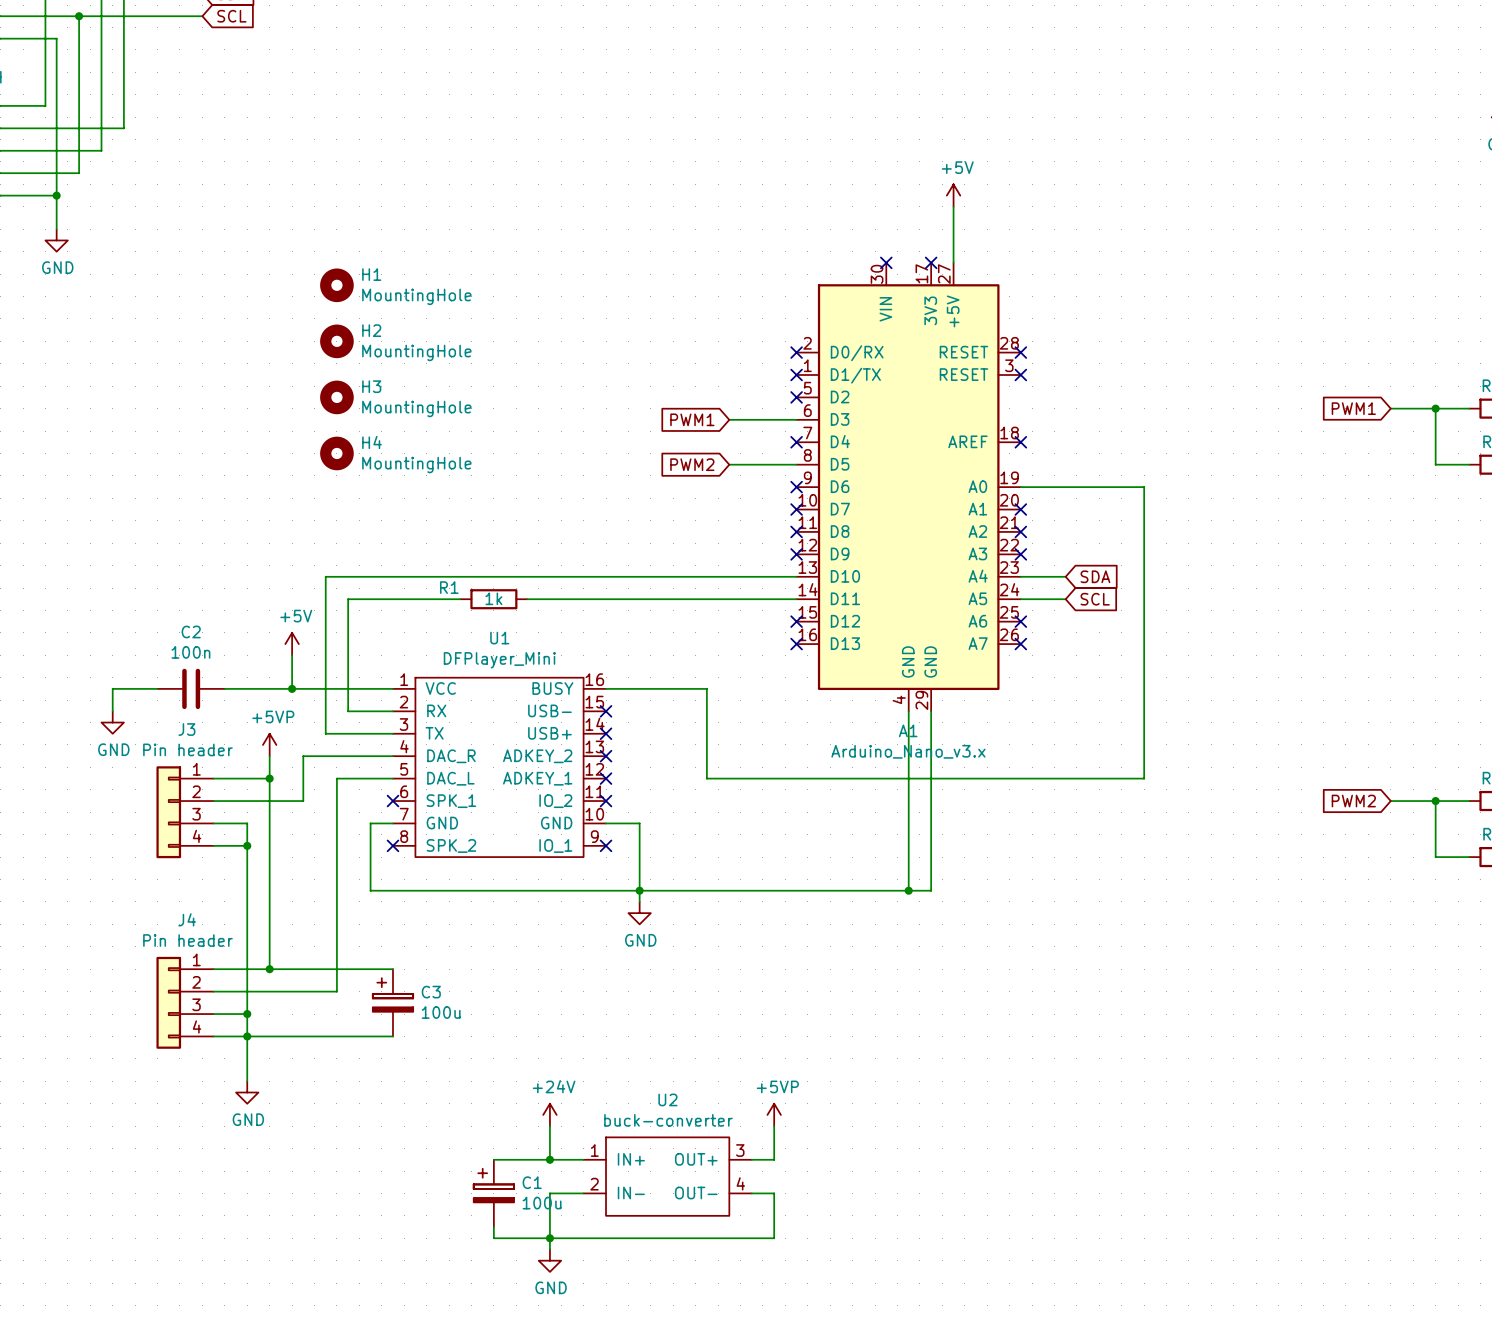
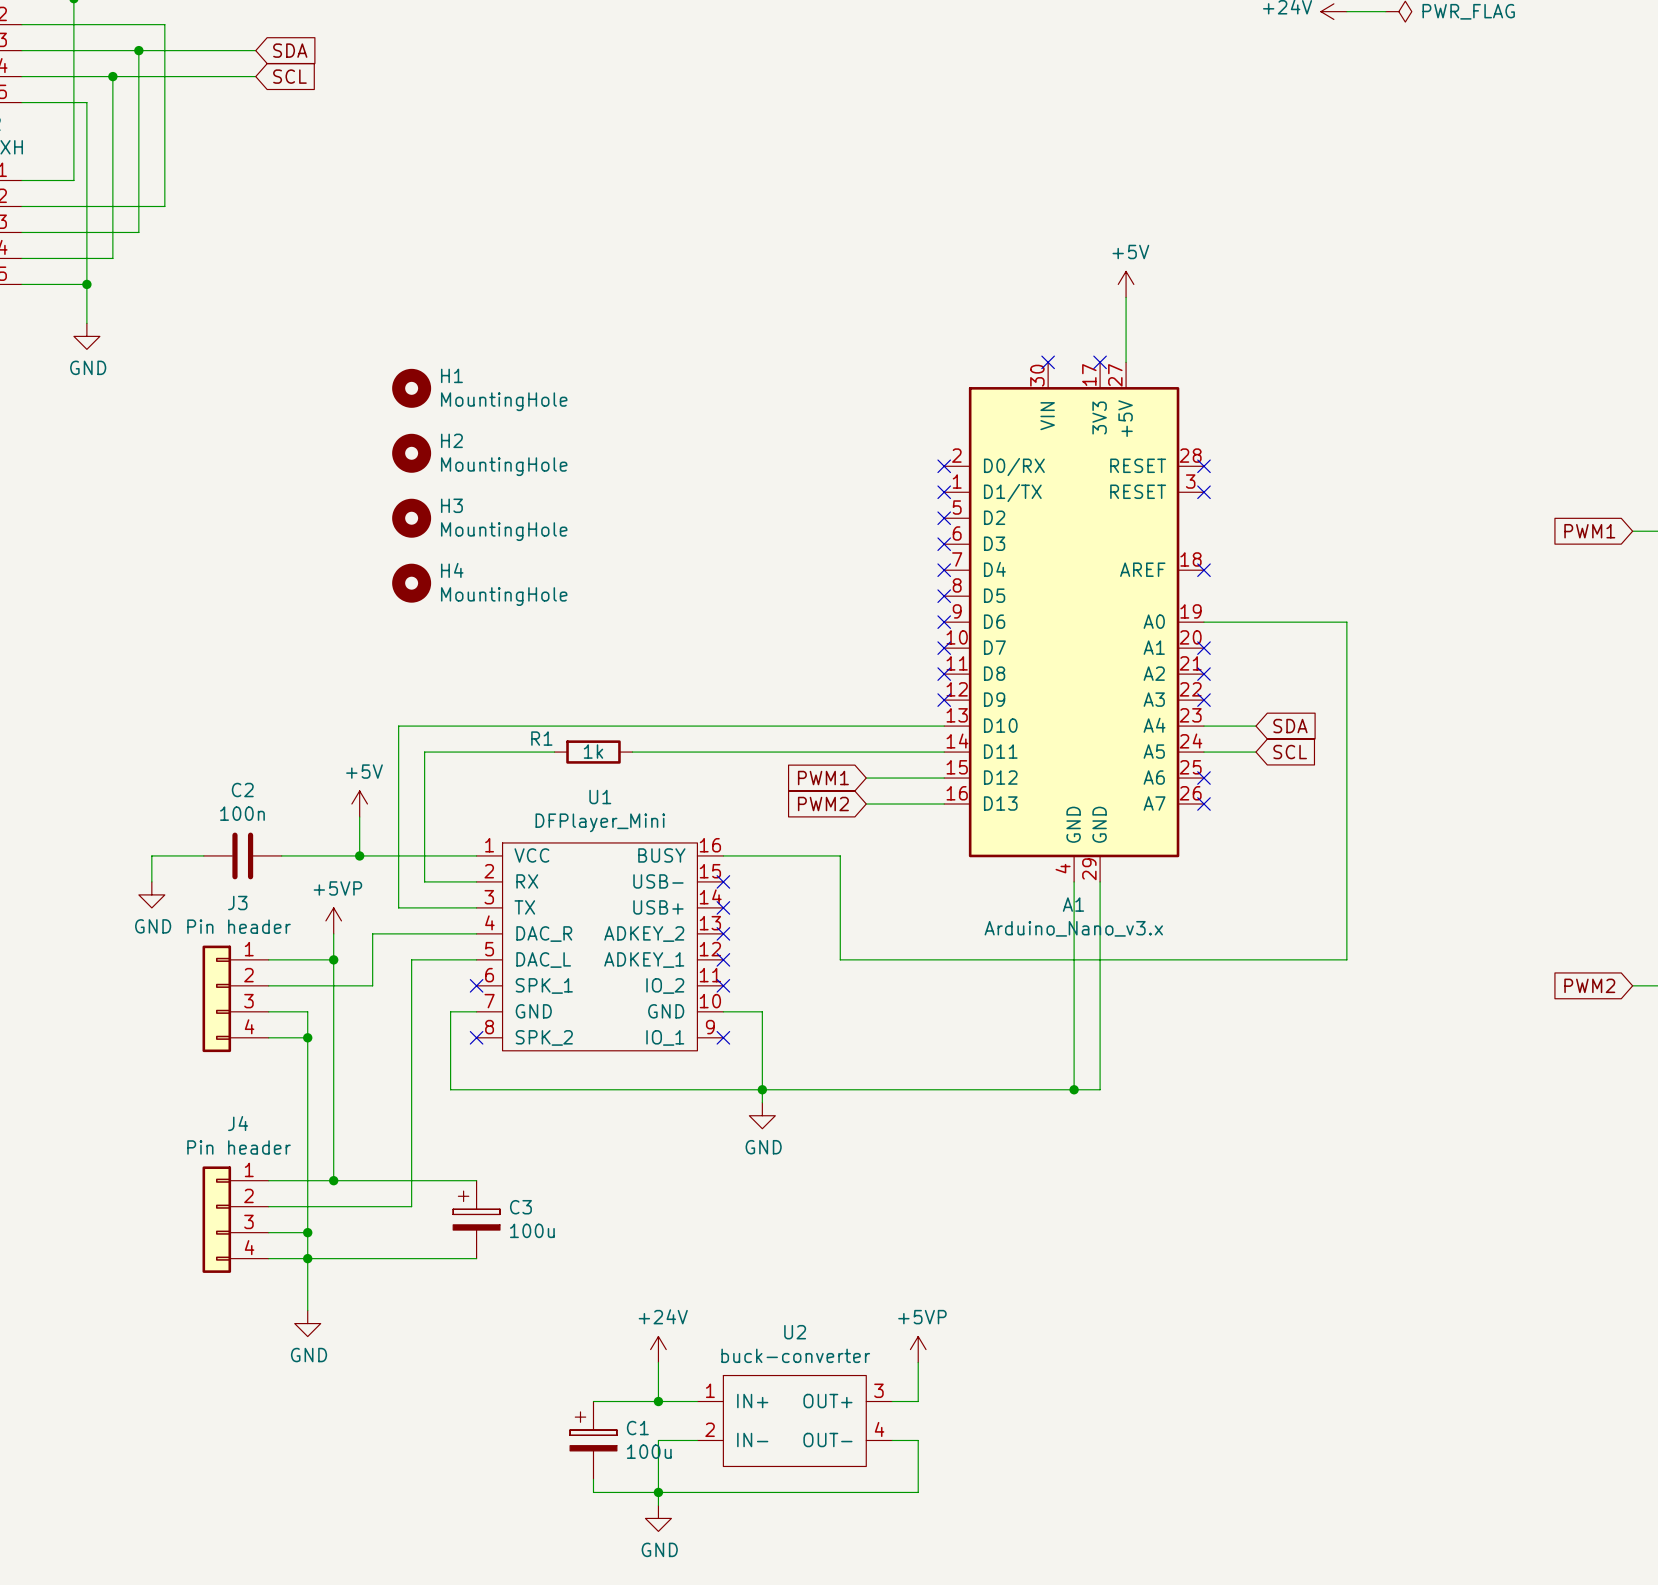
global label position: PWM1 (692, 419) -> PWM1 (823, 778)
wire: (729, 419) (796, 419) -> none
no-connect mark: none -> (944, 544)
global label position: PWM2 (692, 464) -> PWM2 (823, 804)
wire: (729, 464) (796, 464) -> (866, 778) (944, 778)
no-connect mark: none -> (944, 596)
no-connect mark: (796, 621) -> none
wire: none -> (866, 804) (944, 804)
no-connect mark: (796, 644) -> none

